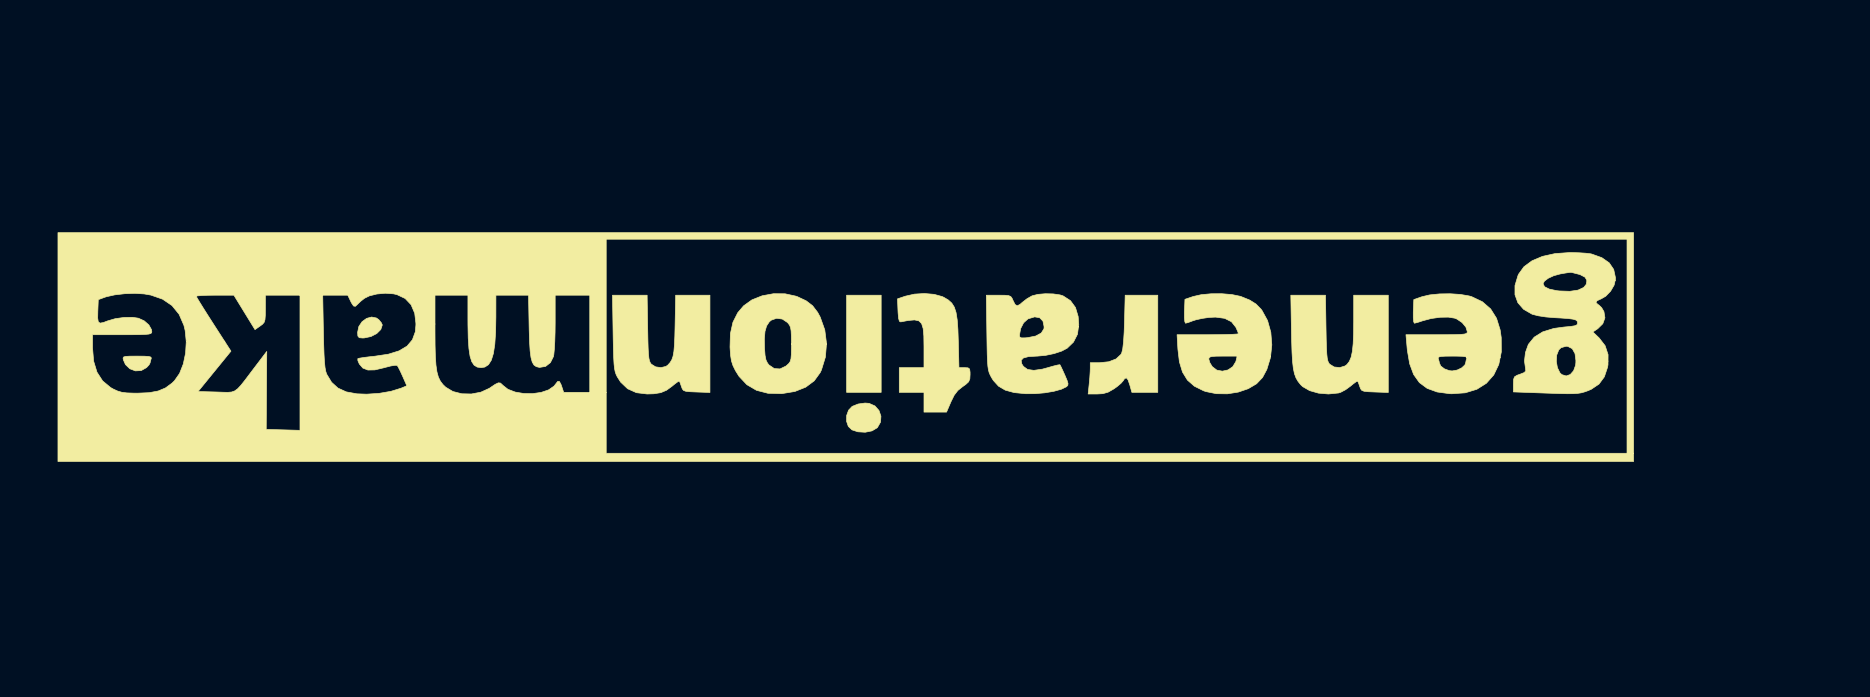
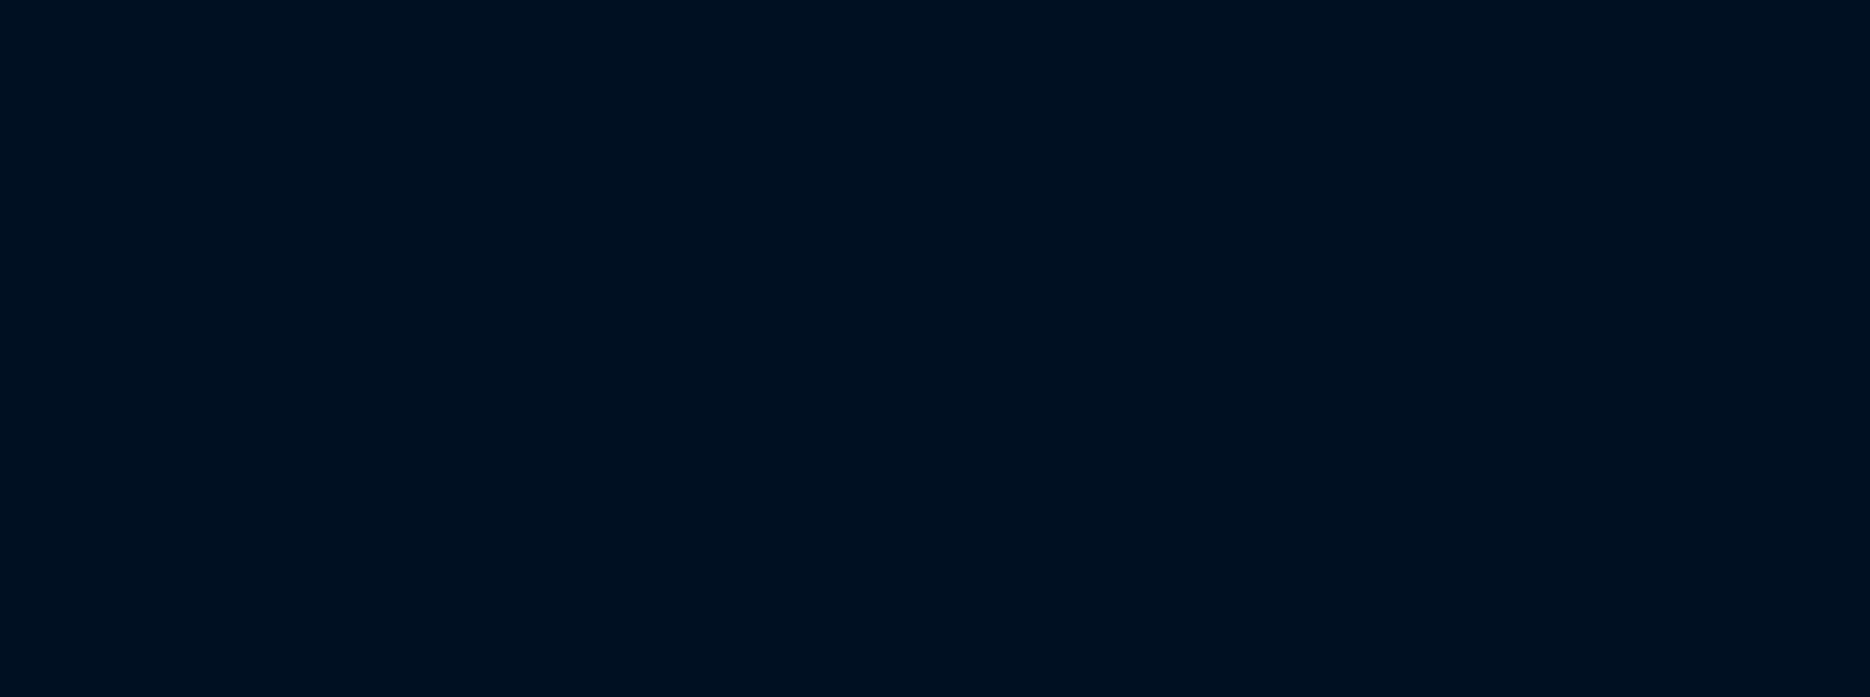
drawing: [57, 232, 1634, 462] -> none

